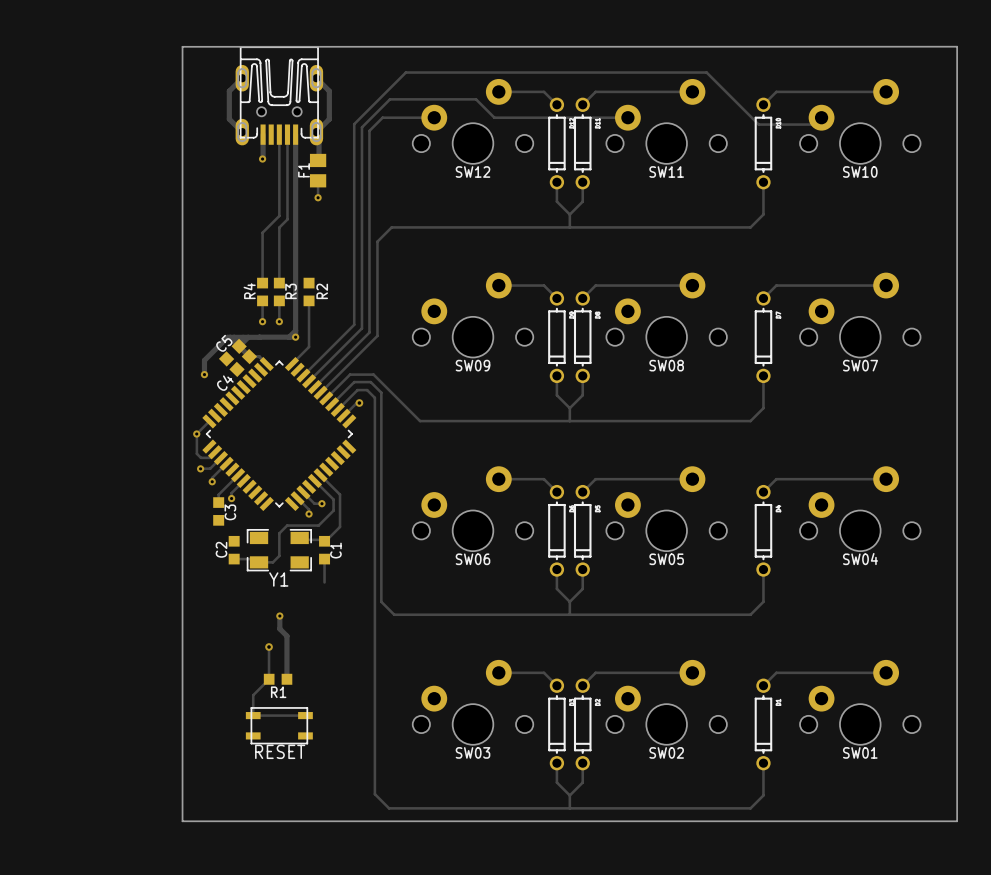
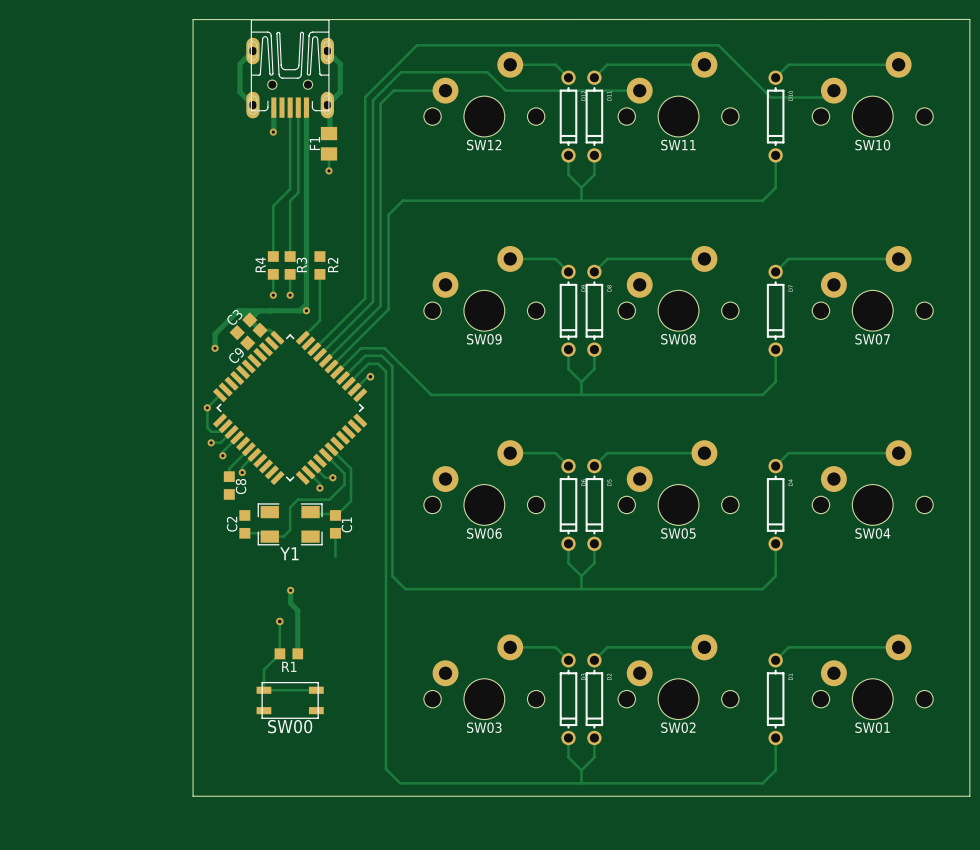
C5 name: C5 (224, 343) -> C3 (234, 317)
C4 name: C4 (225, 383) -> C9 (236, 355)
C3 name: C3 (230, 512) -> C8 (241, 486)
RESET name: RESET (280, 751) -> SW00 (290, 726)

